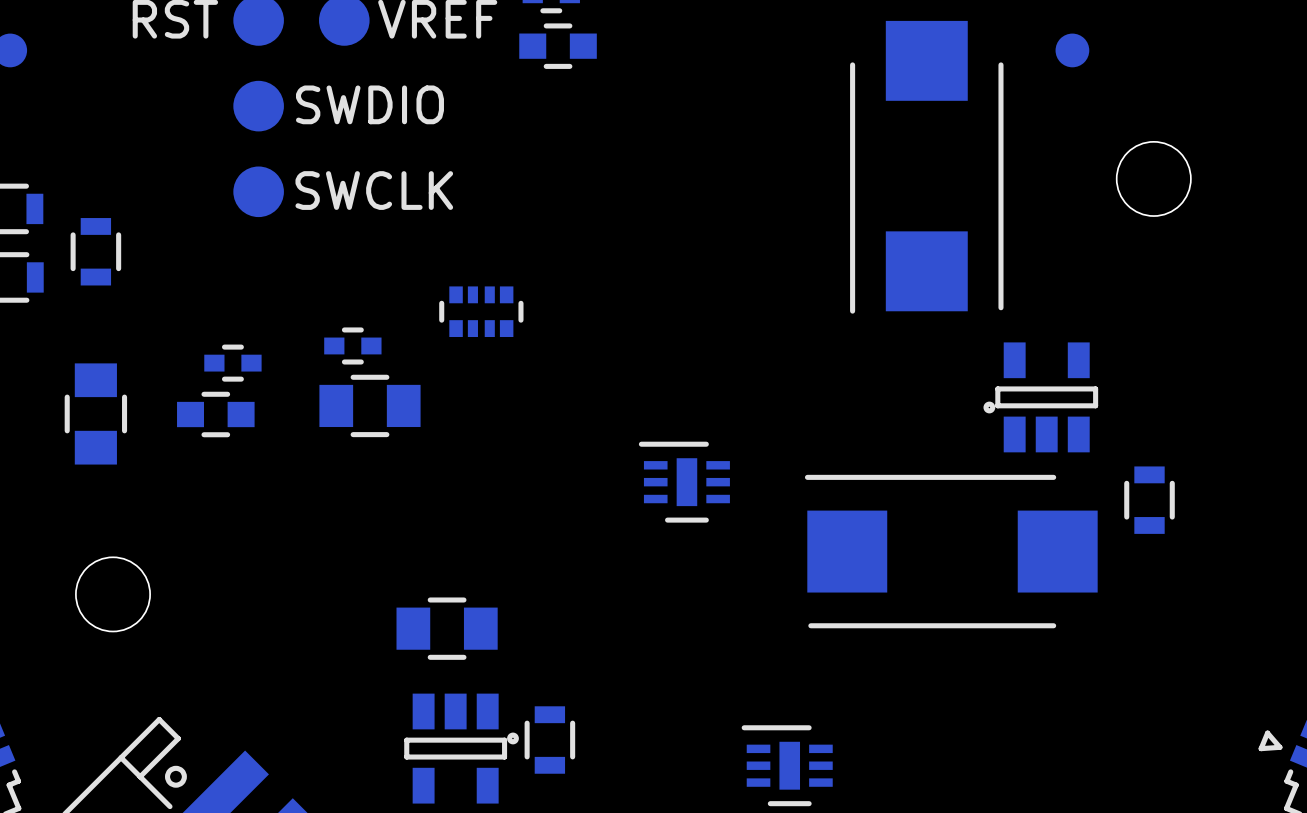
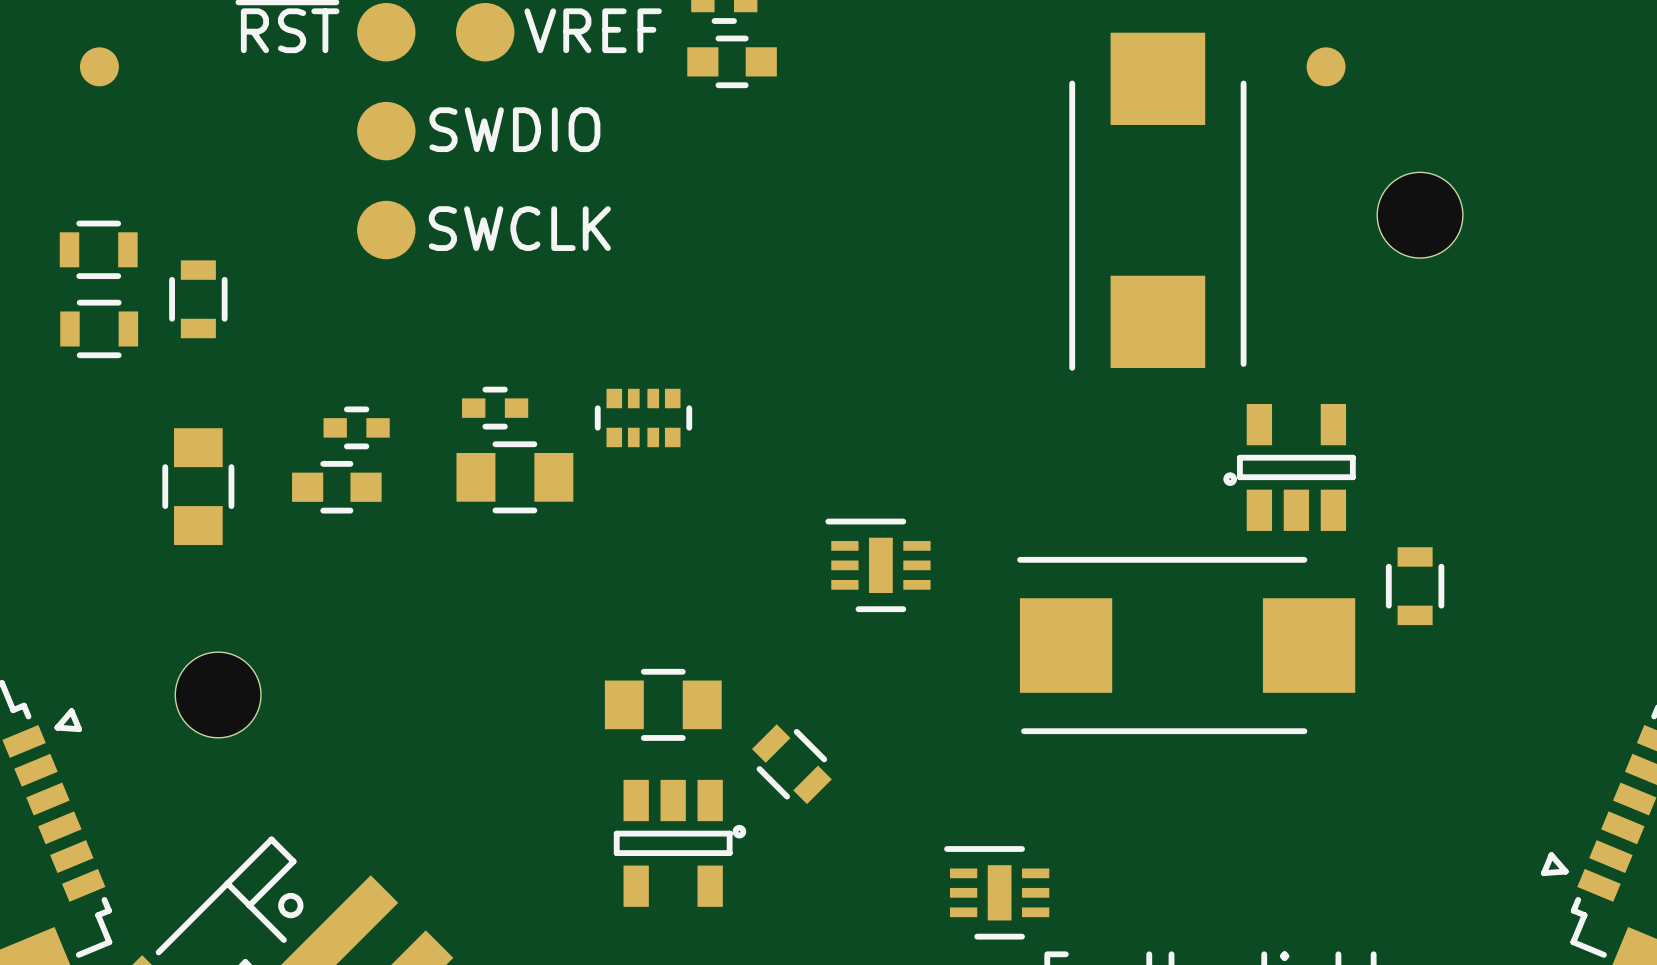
part position: (481, 311) -> (643, 417)
part position: (447, 628) -> (663, 704)
part: none -> (791, 764)
part: (549, 740) -> none
part position: (461, 748) -> (679, 843)

